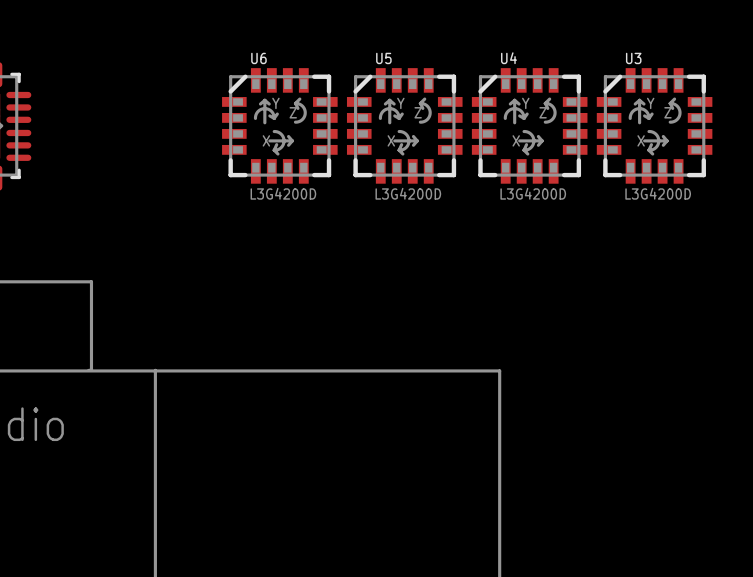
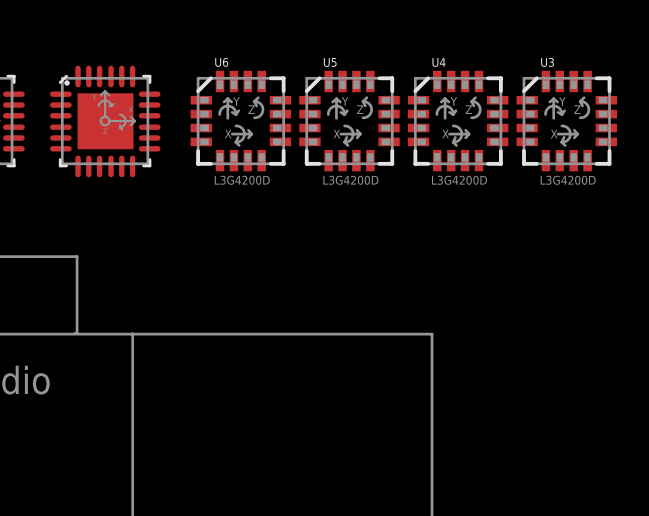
part: none -> (105, 121)

